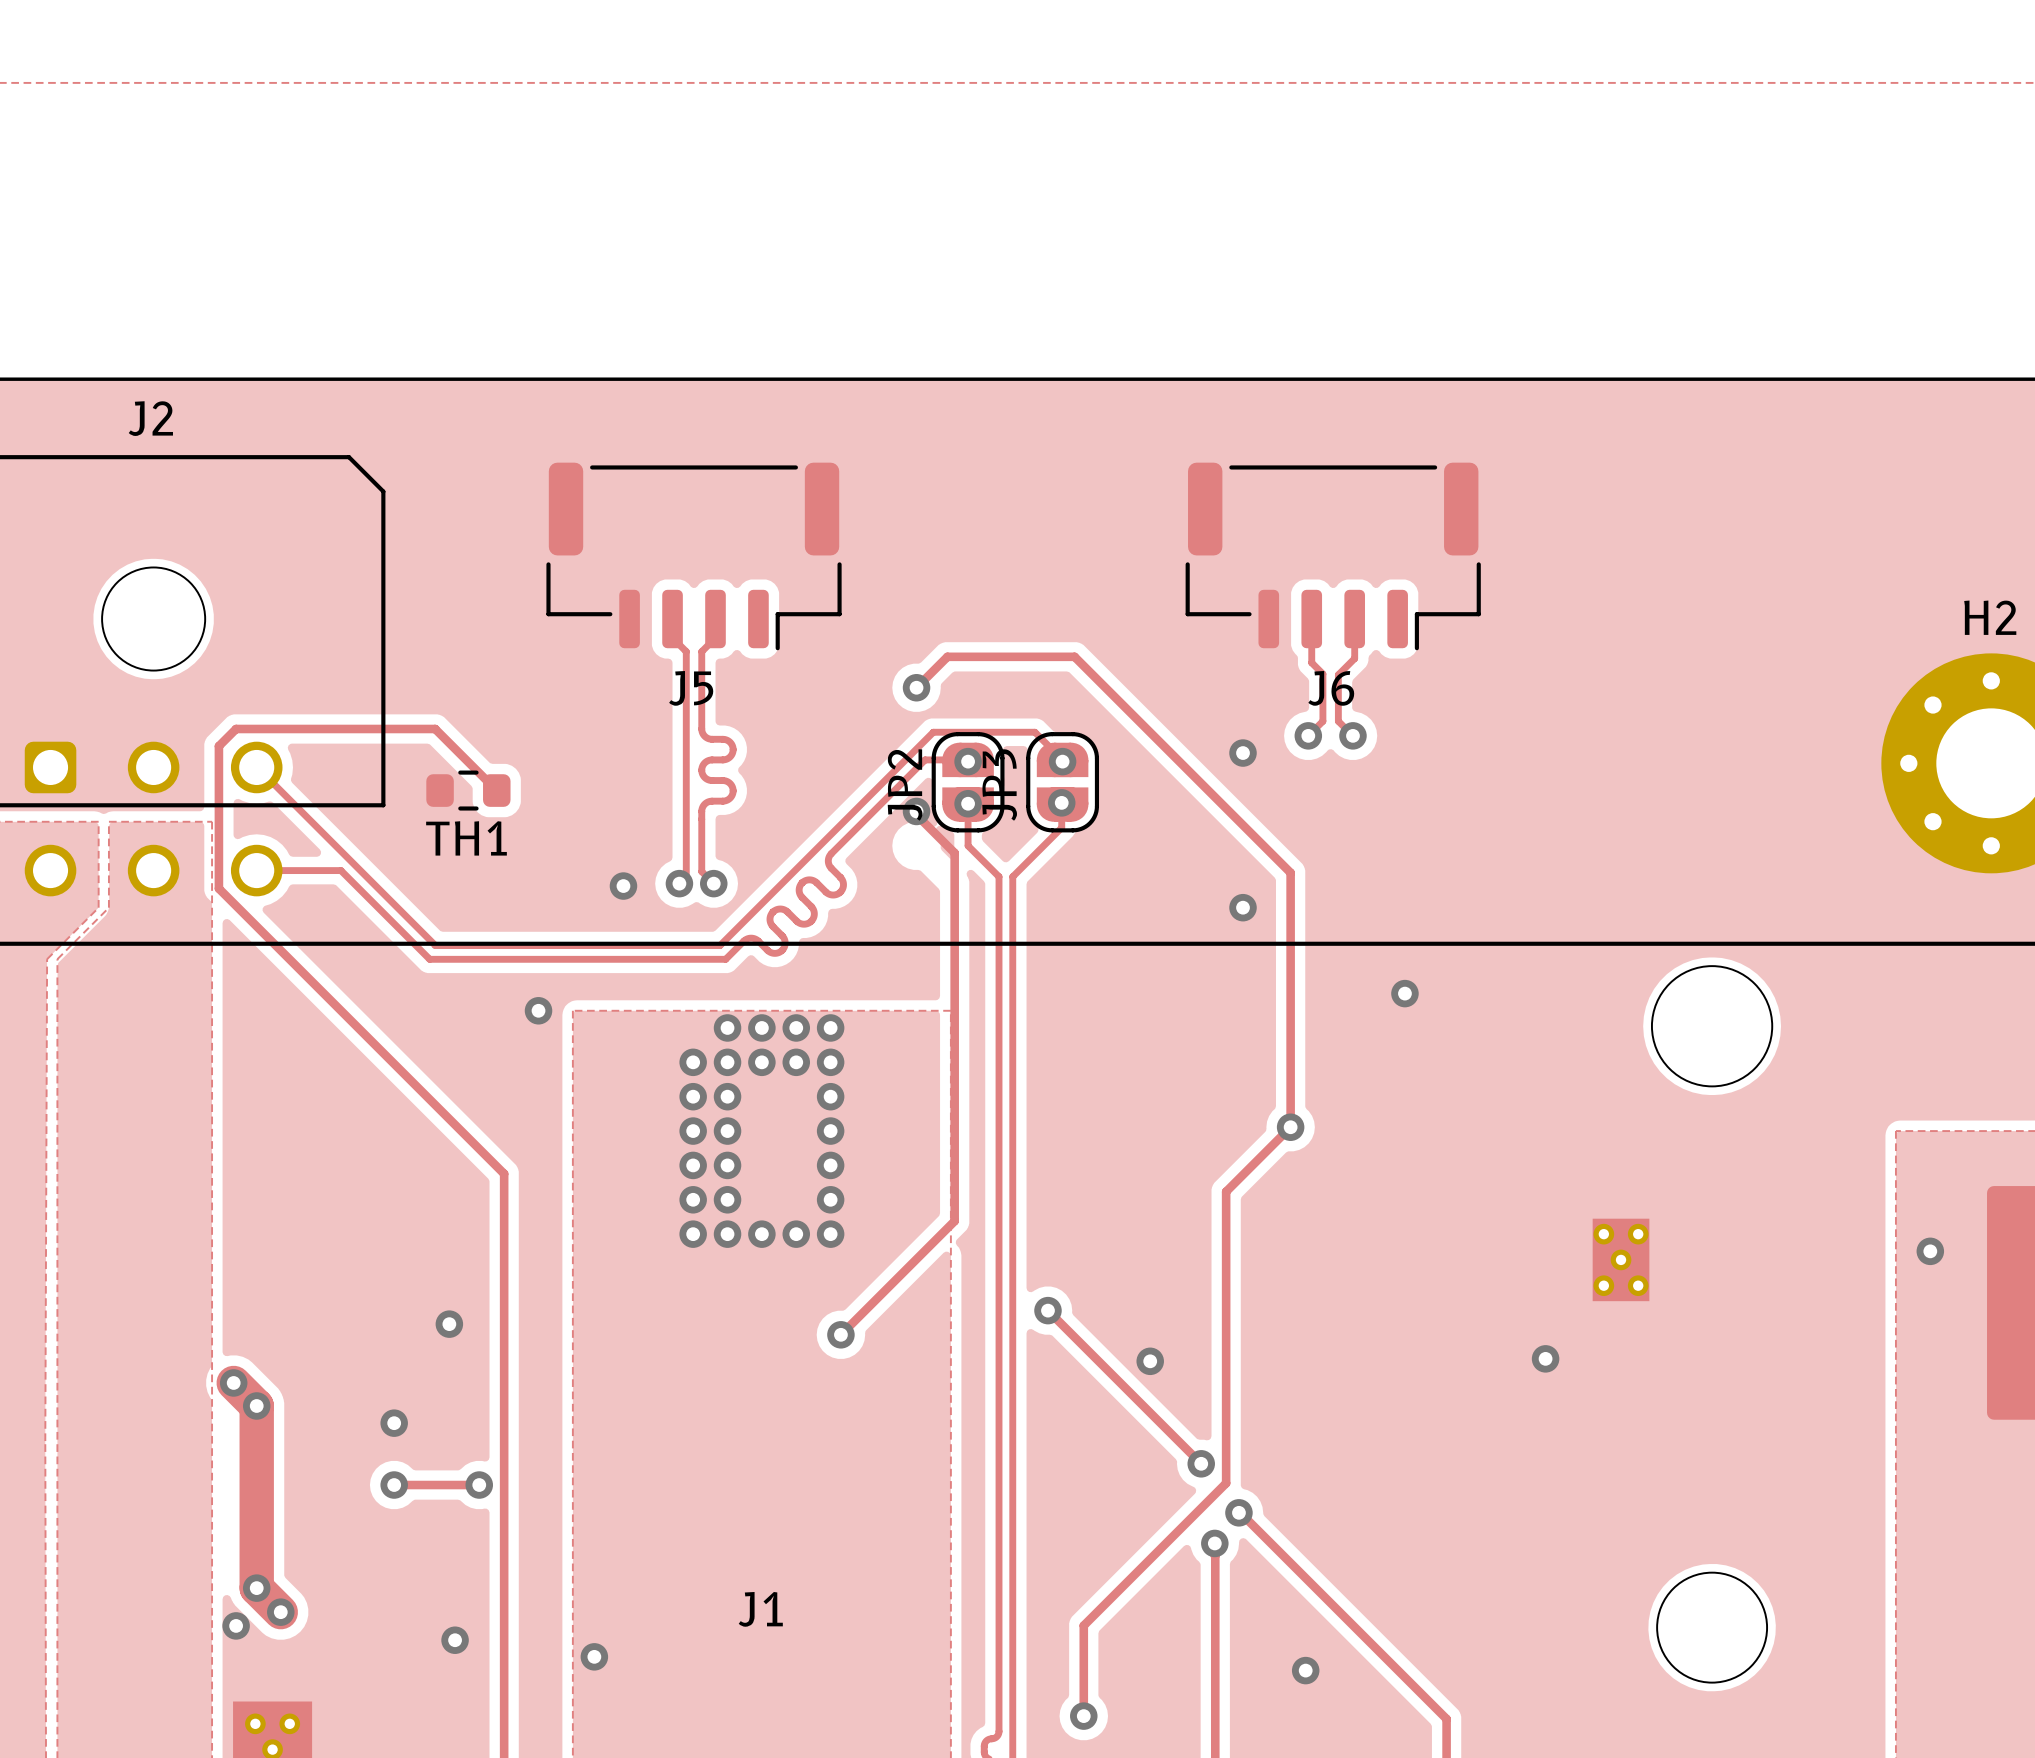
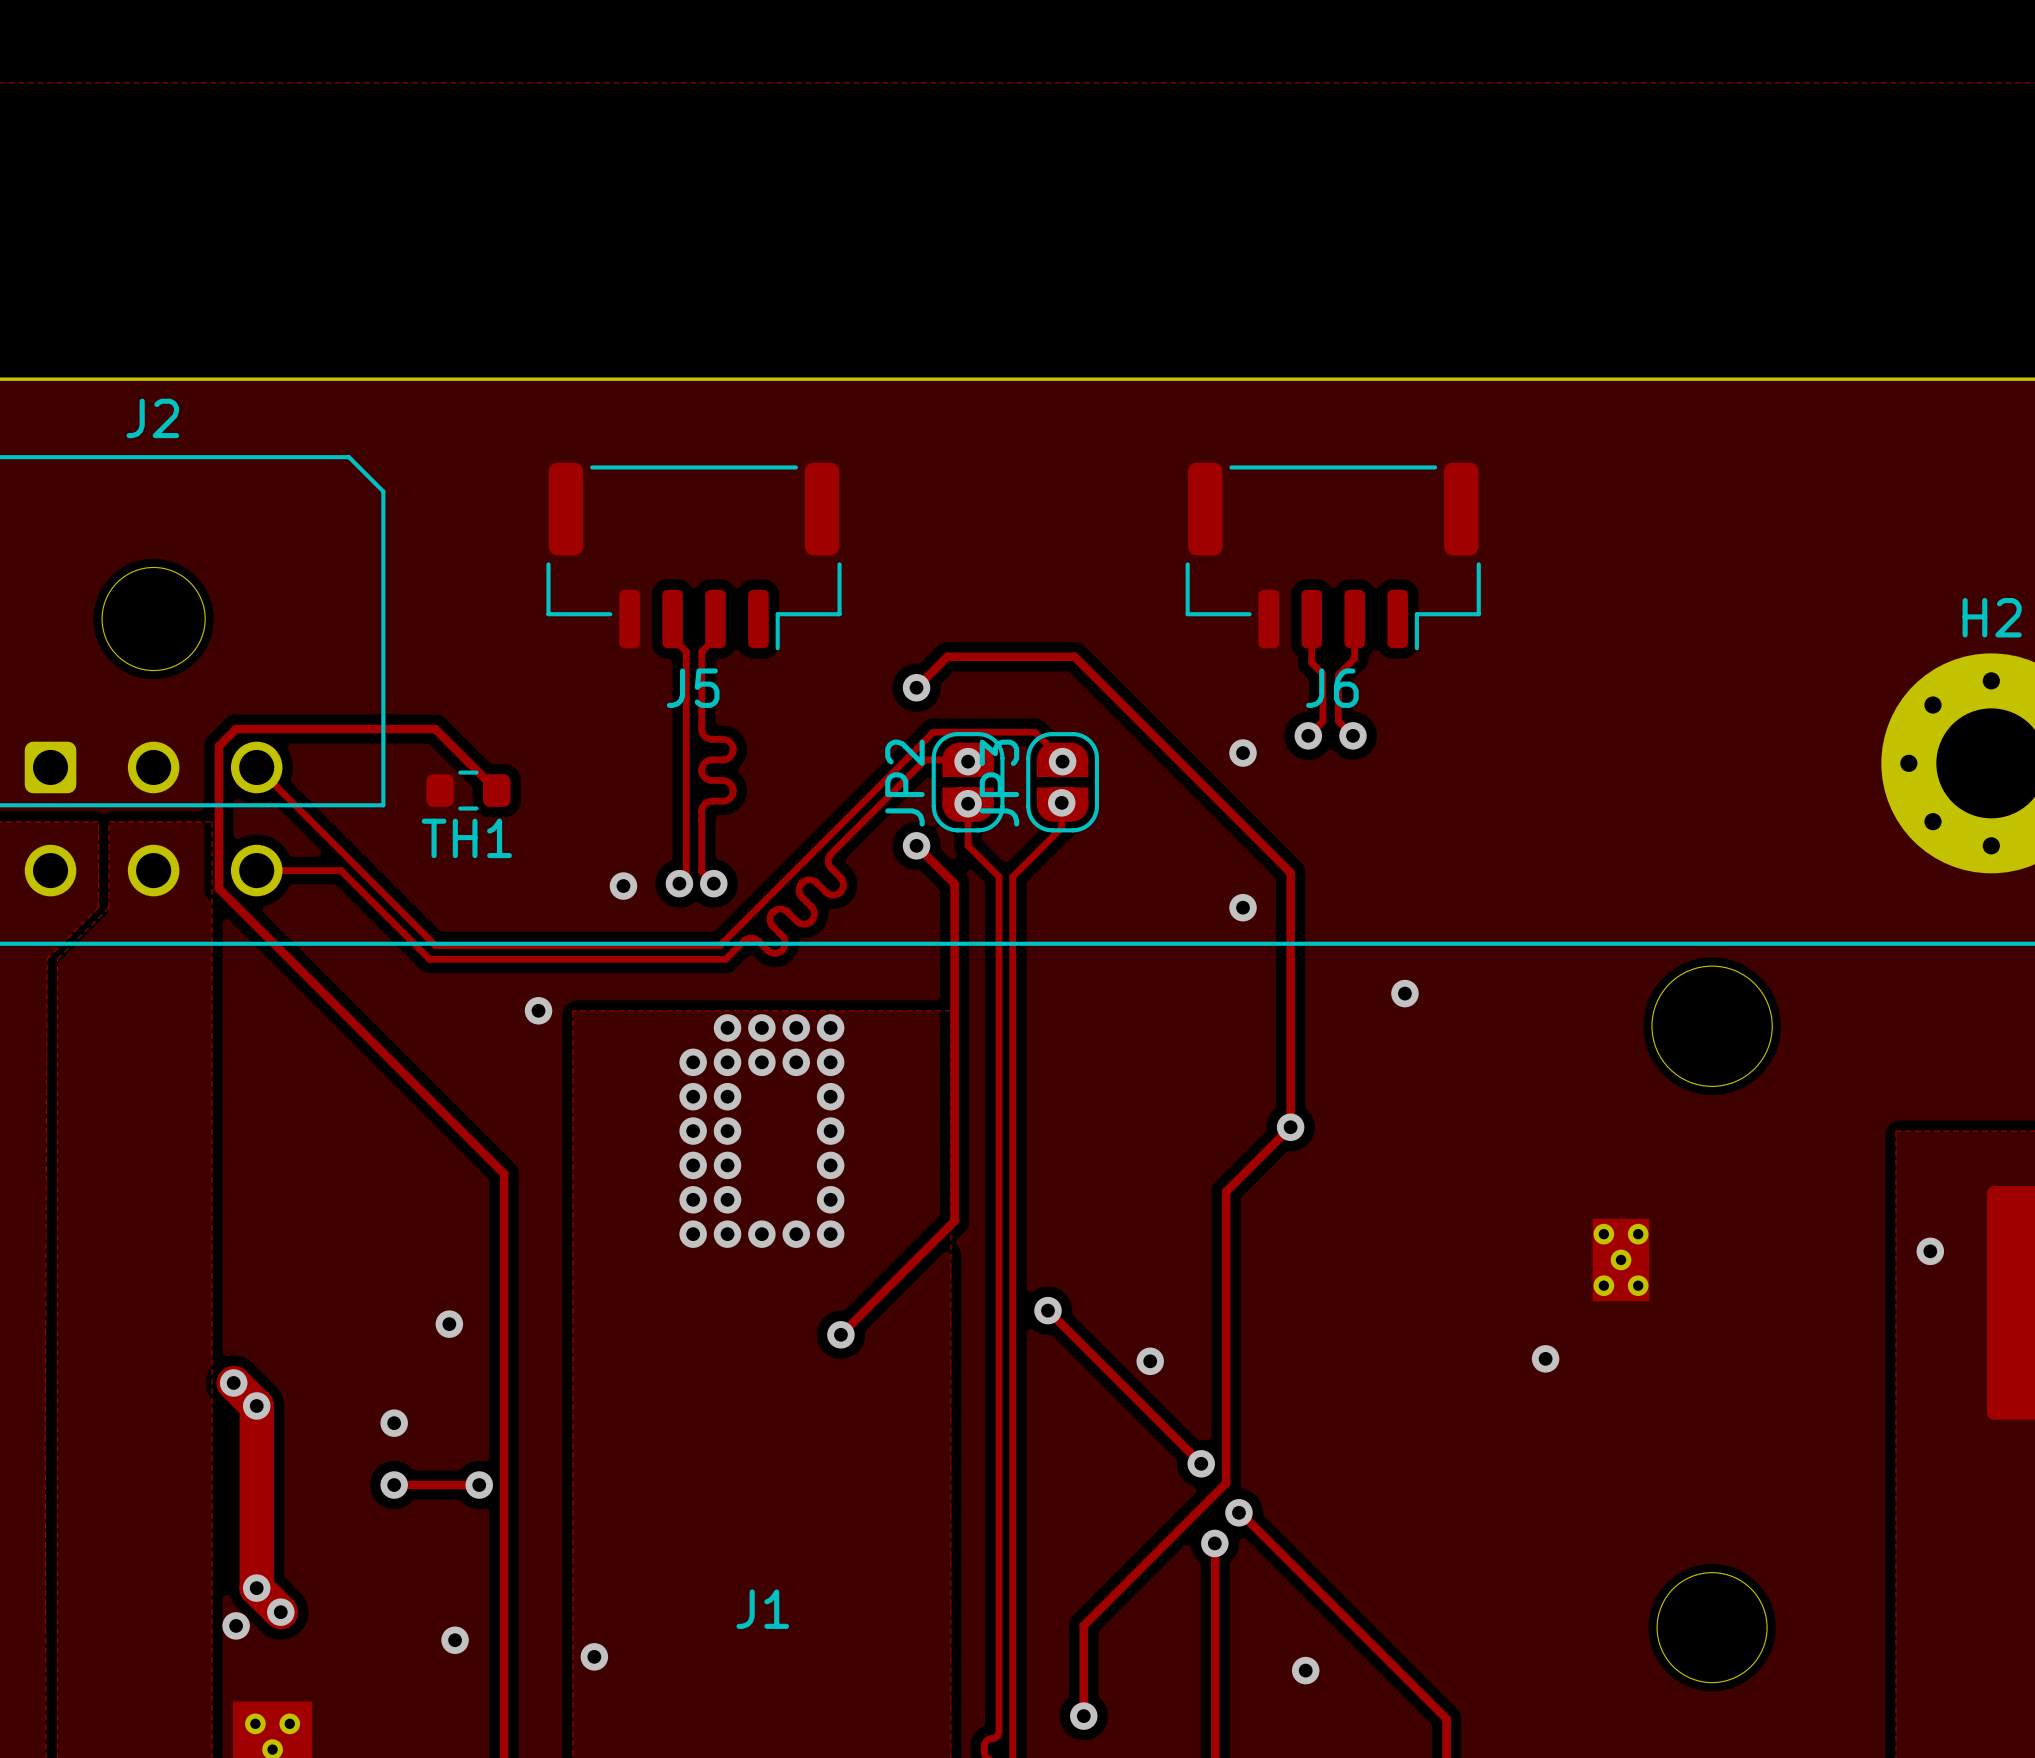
via position: (916, 811) -> (916, 845)
track: (921, 816) (916, 811) (916, 814) (954, 853) (954, 883) -> (916, 845) (954, 883)

